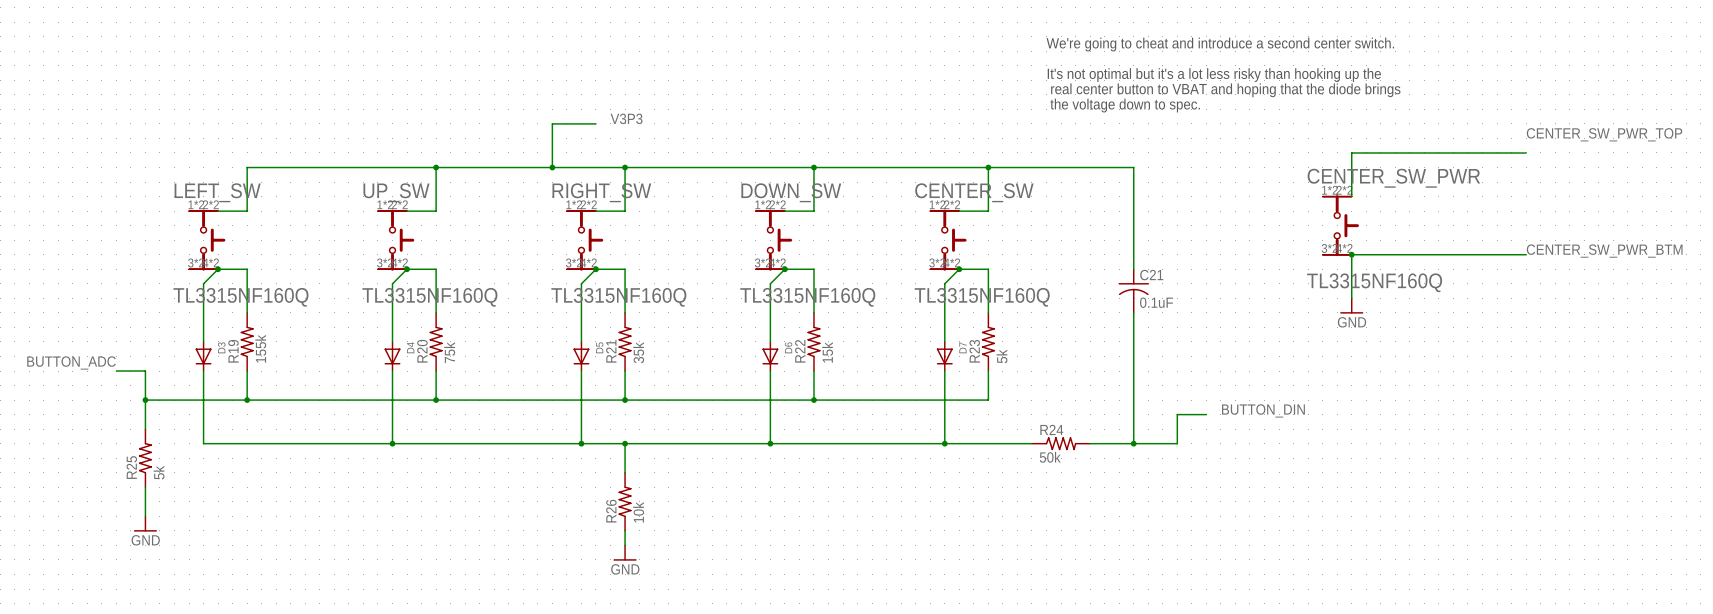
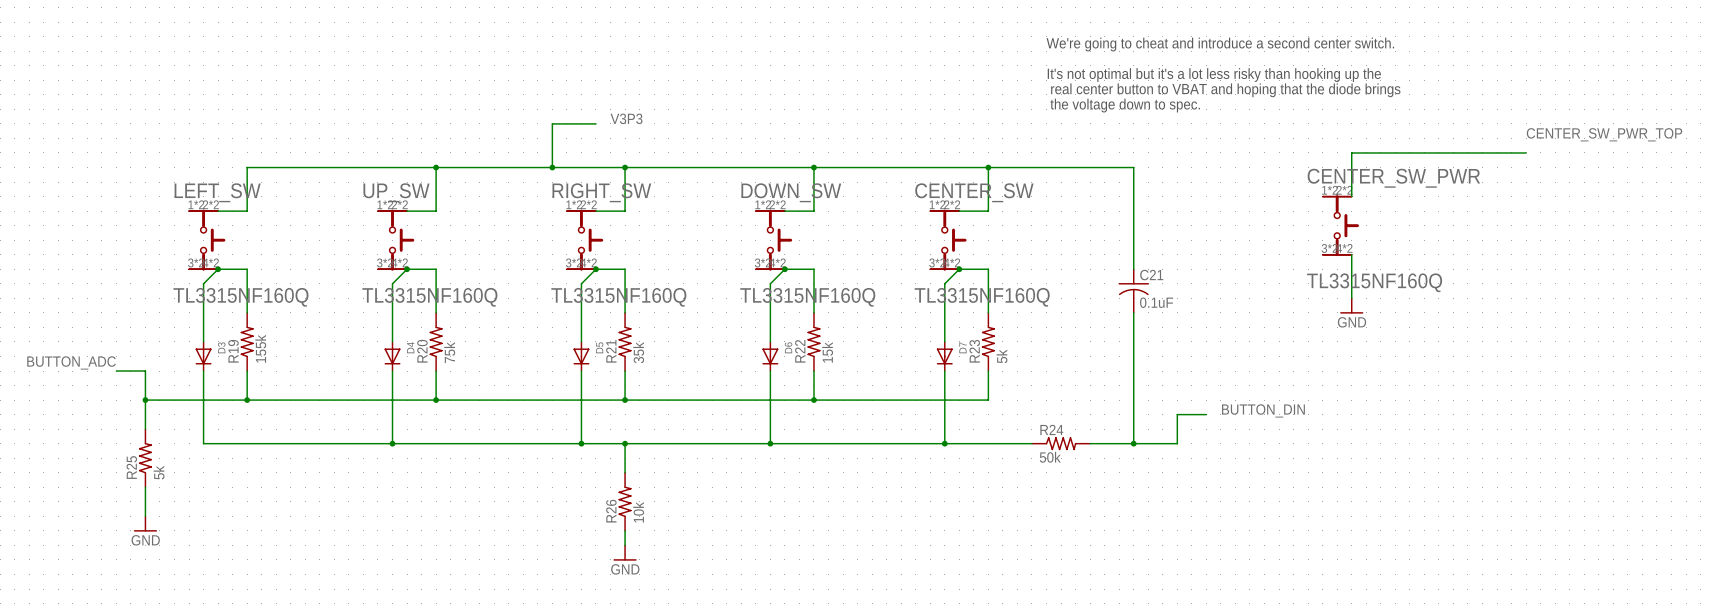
label: CENTER_SW_PWR_BTM (1604, 251) -> none
wire: (1351, 254) (1526, 254) -> none
junction: (1351, 254) -> none

